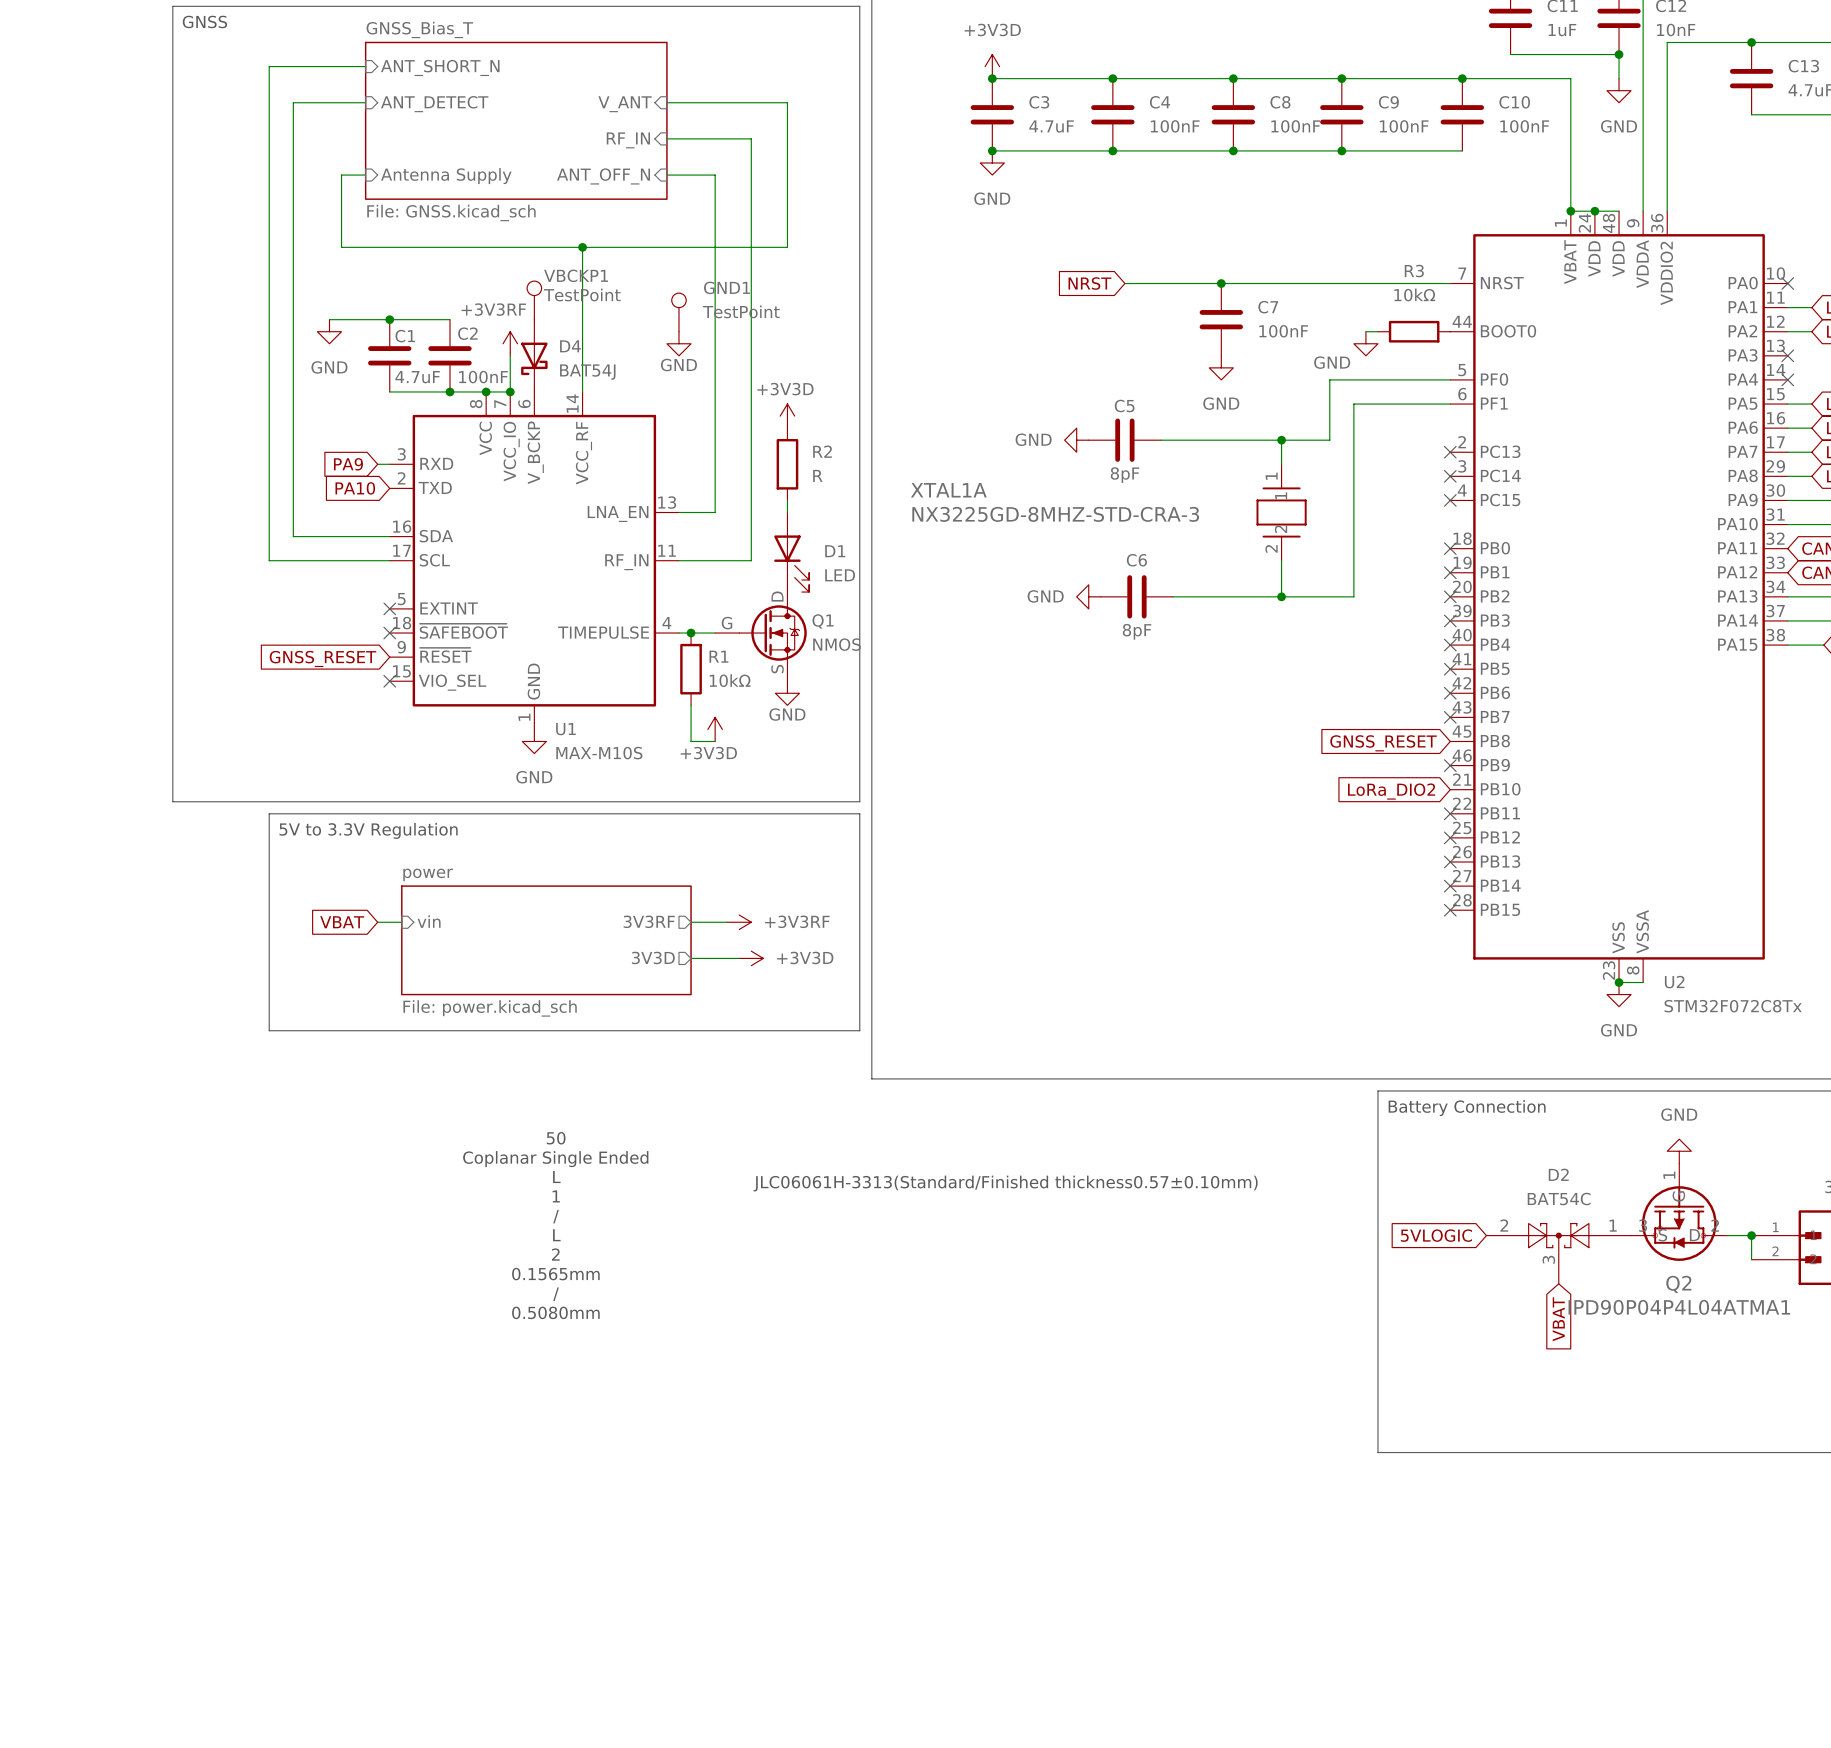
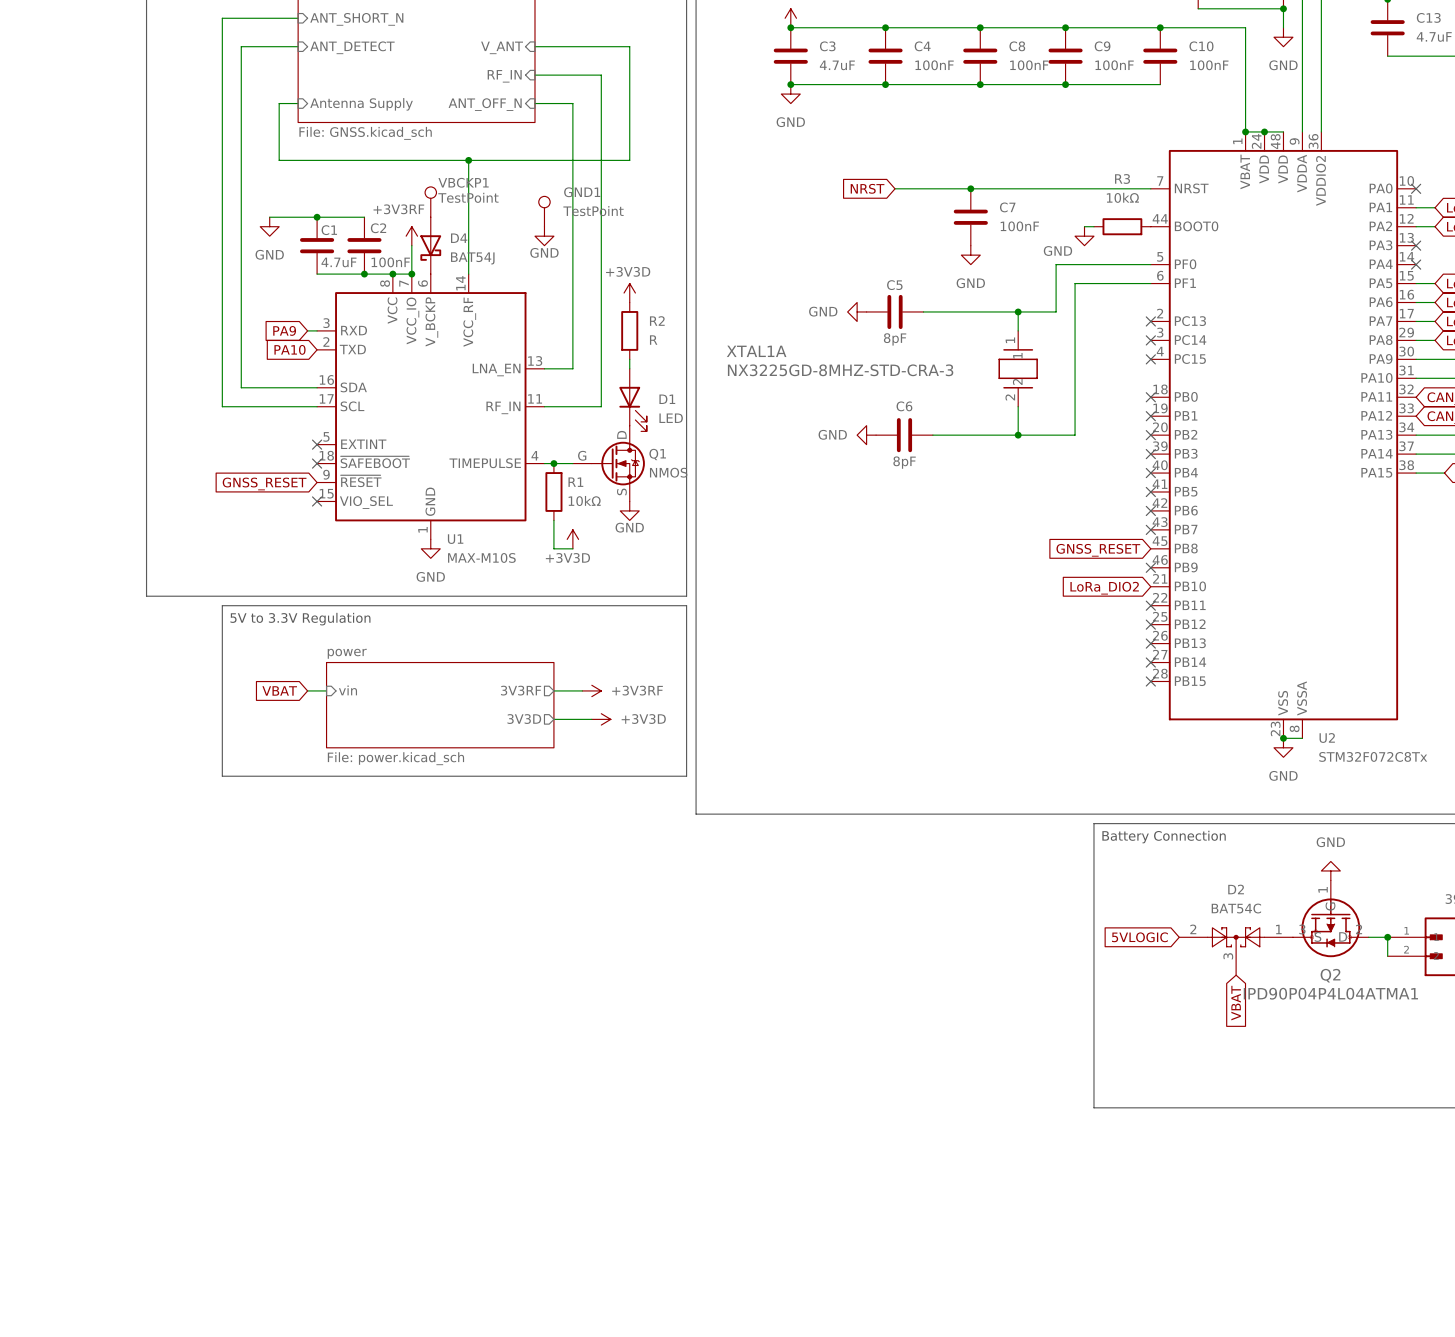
text: 50 (556, 1138) -> none
text: Coplanar Single Ended (555, 1159) -> none
text: L (556, 1177) -> none
text: JLC06061H-3313(Standard/Finished thickness0.57±0.10mm) (1005, 1183) -> none
text: 1 (556, 1196) -> none
text: / (556, 1216) -> none
text: L (556, 1235) -> none
text: 2 (555, 1254) -> none
text: 0.1565mm (555, 1274) -> none
text: / (556, 1294) -> none
text: 0.5080mm (555, 1312) -> none

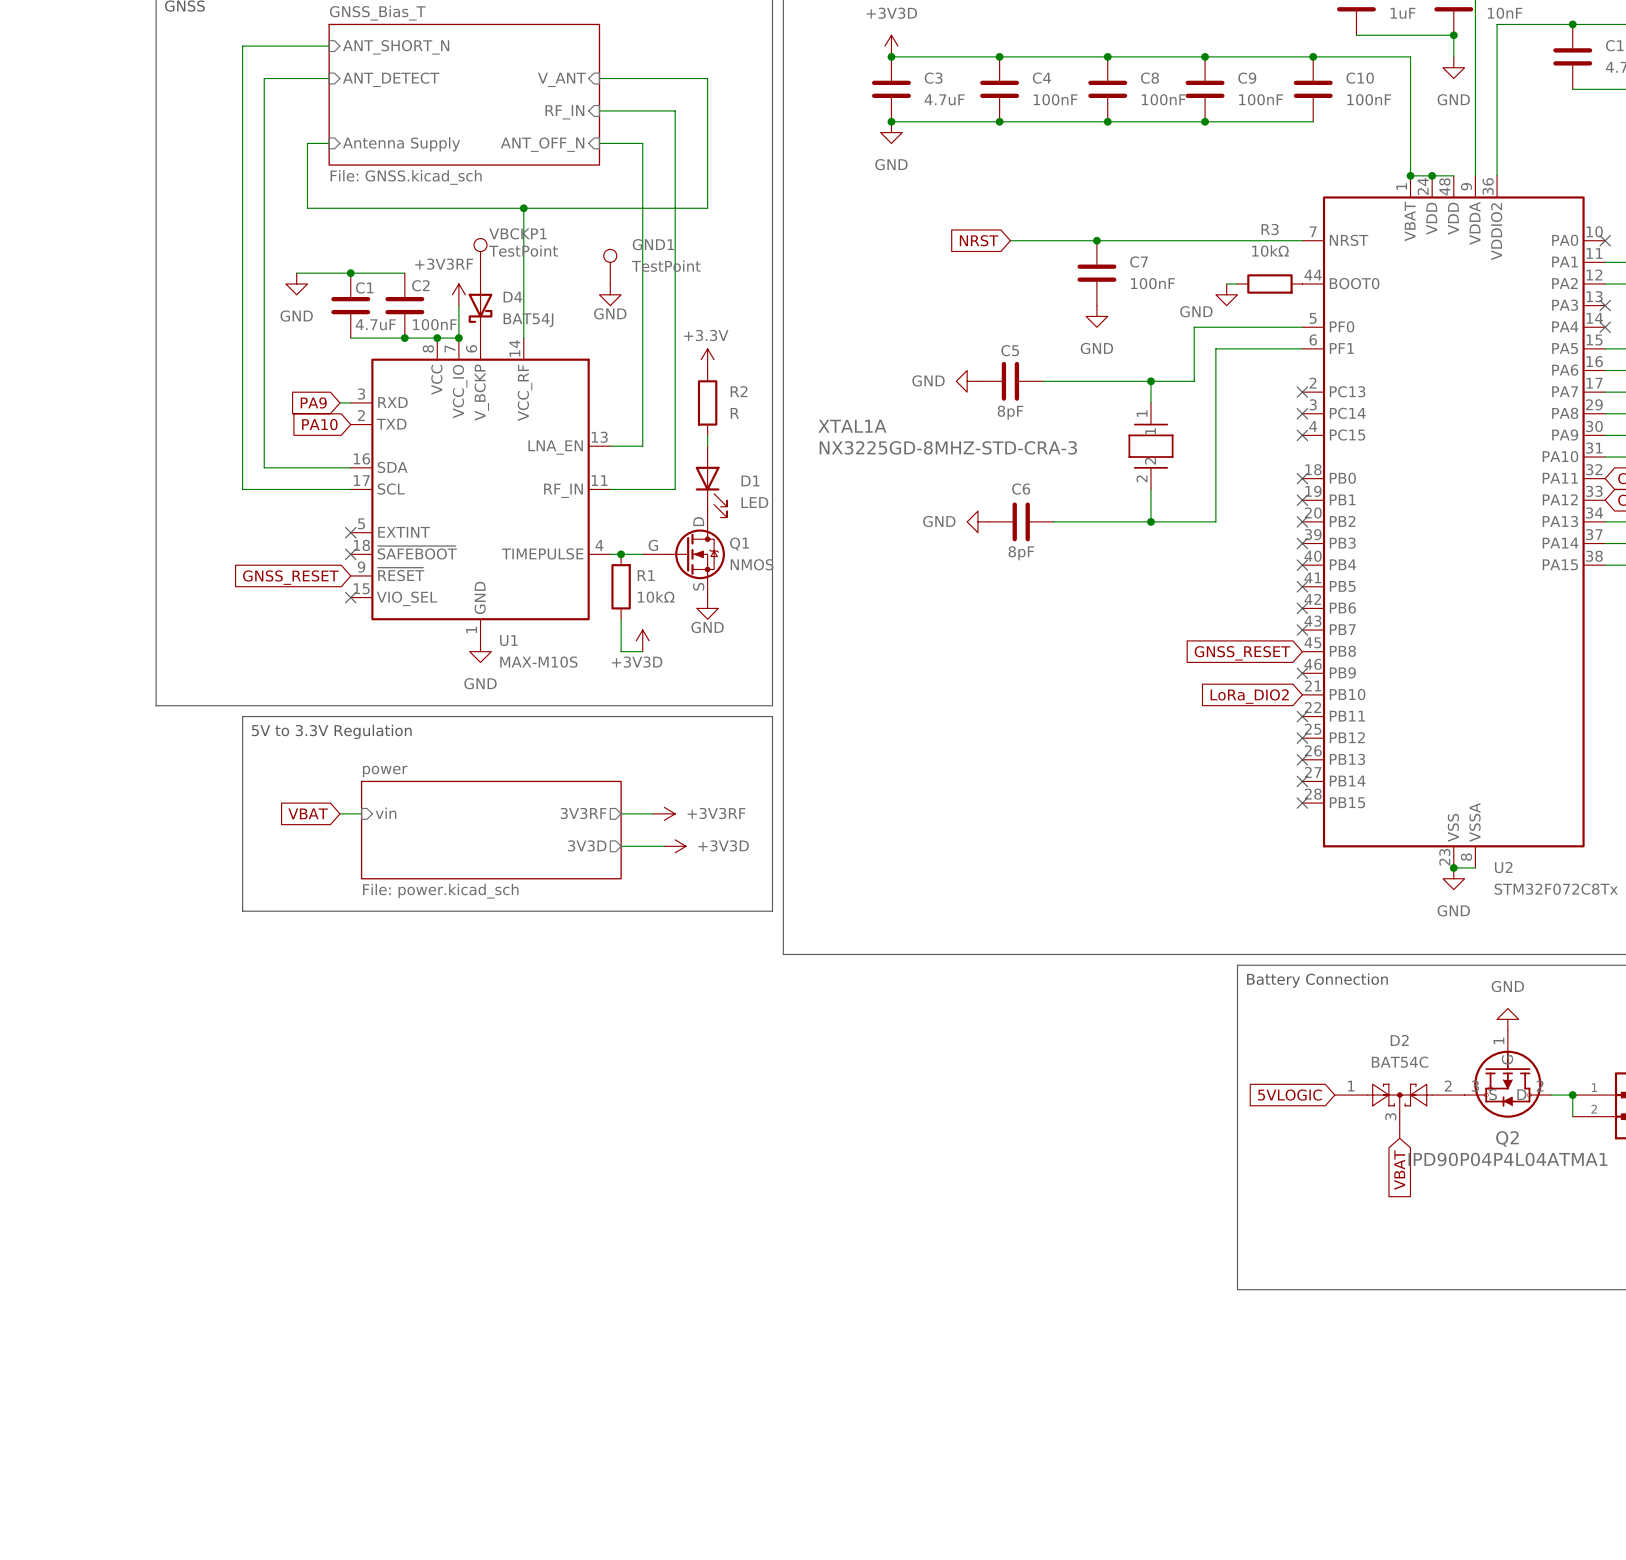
power symbol: +3V3D (629, 293) -> +3.3V (707, 359)
D2 flip: as is (1236, 937) -> left-right (1399, 1095)

